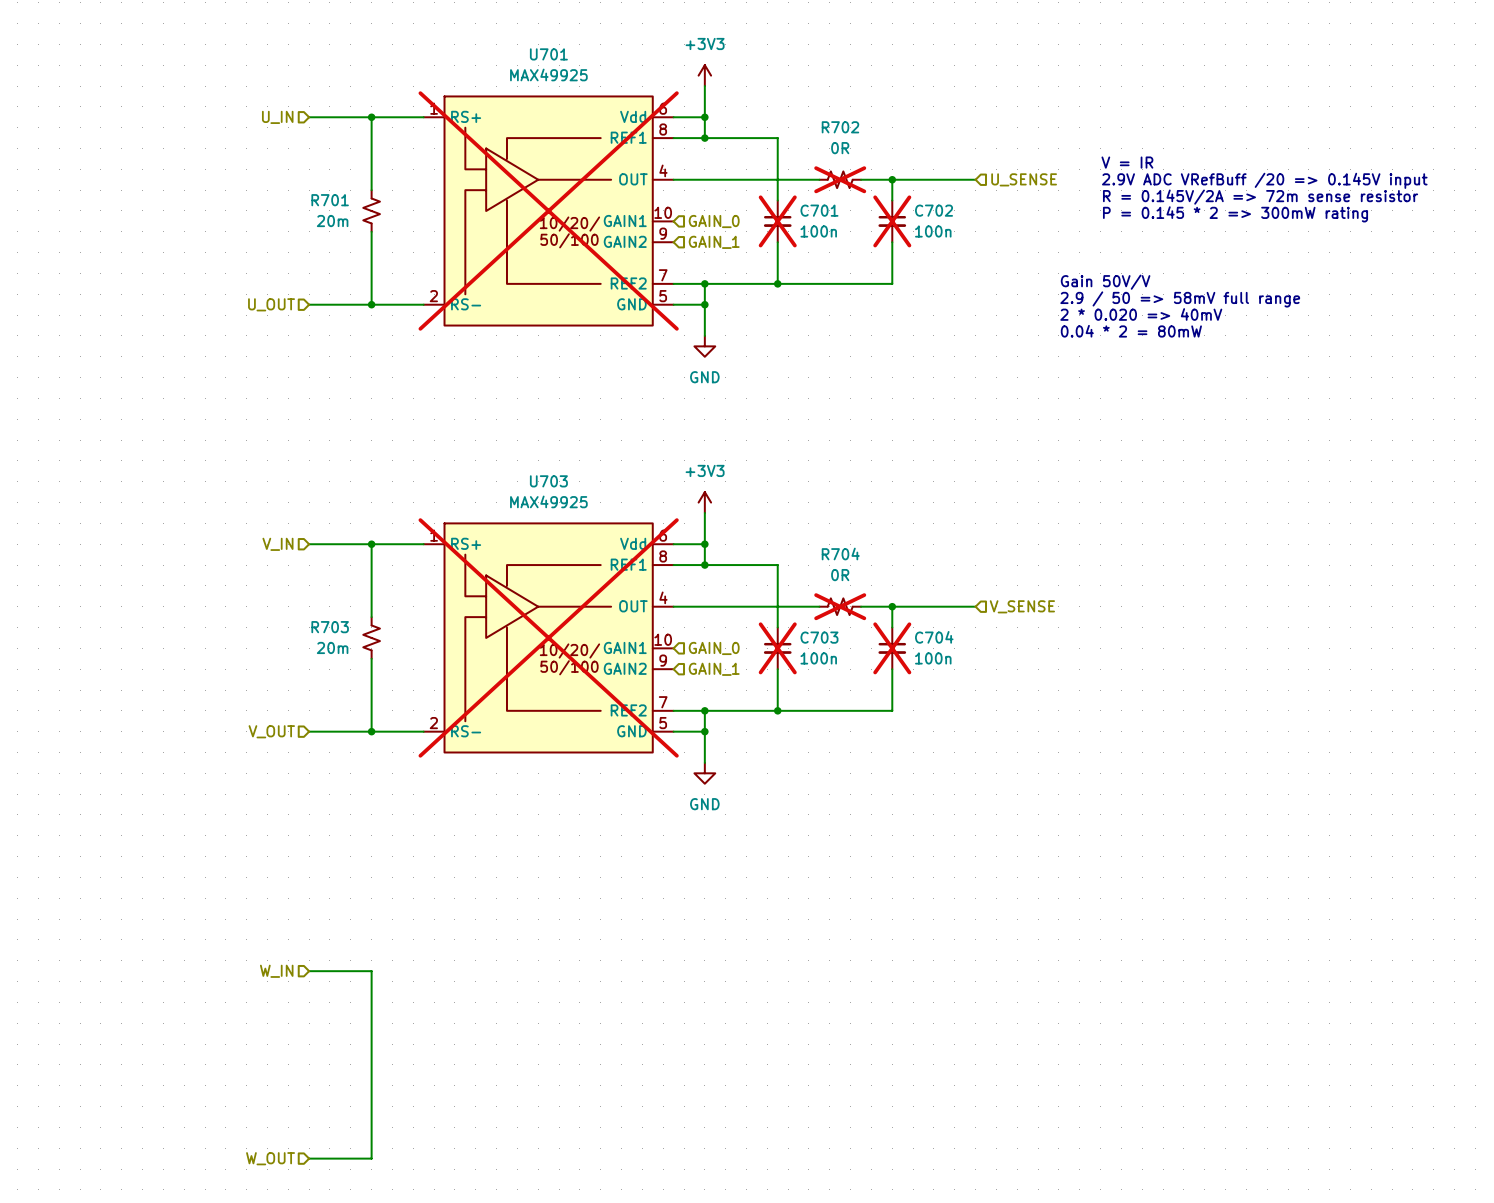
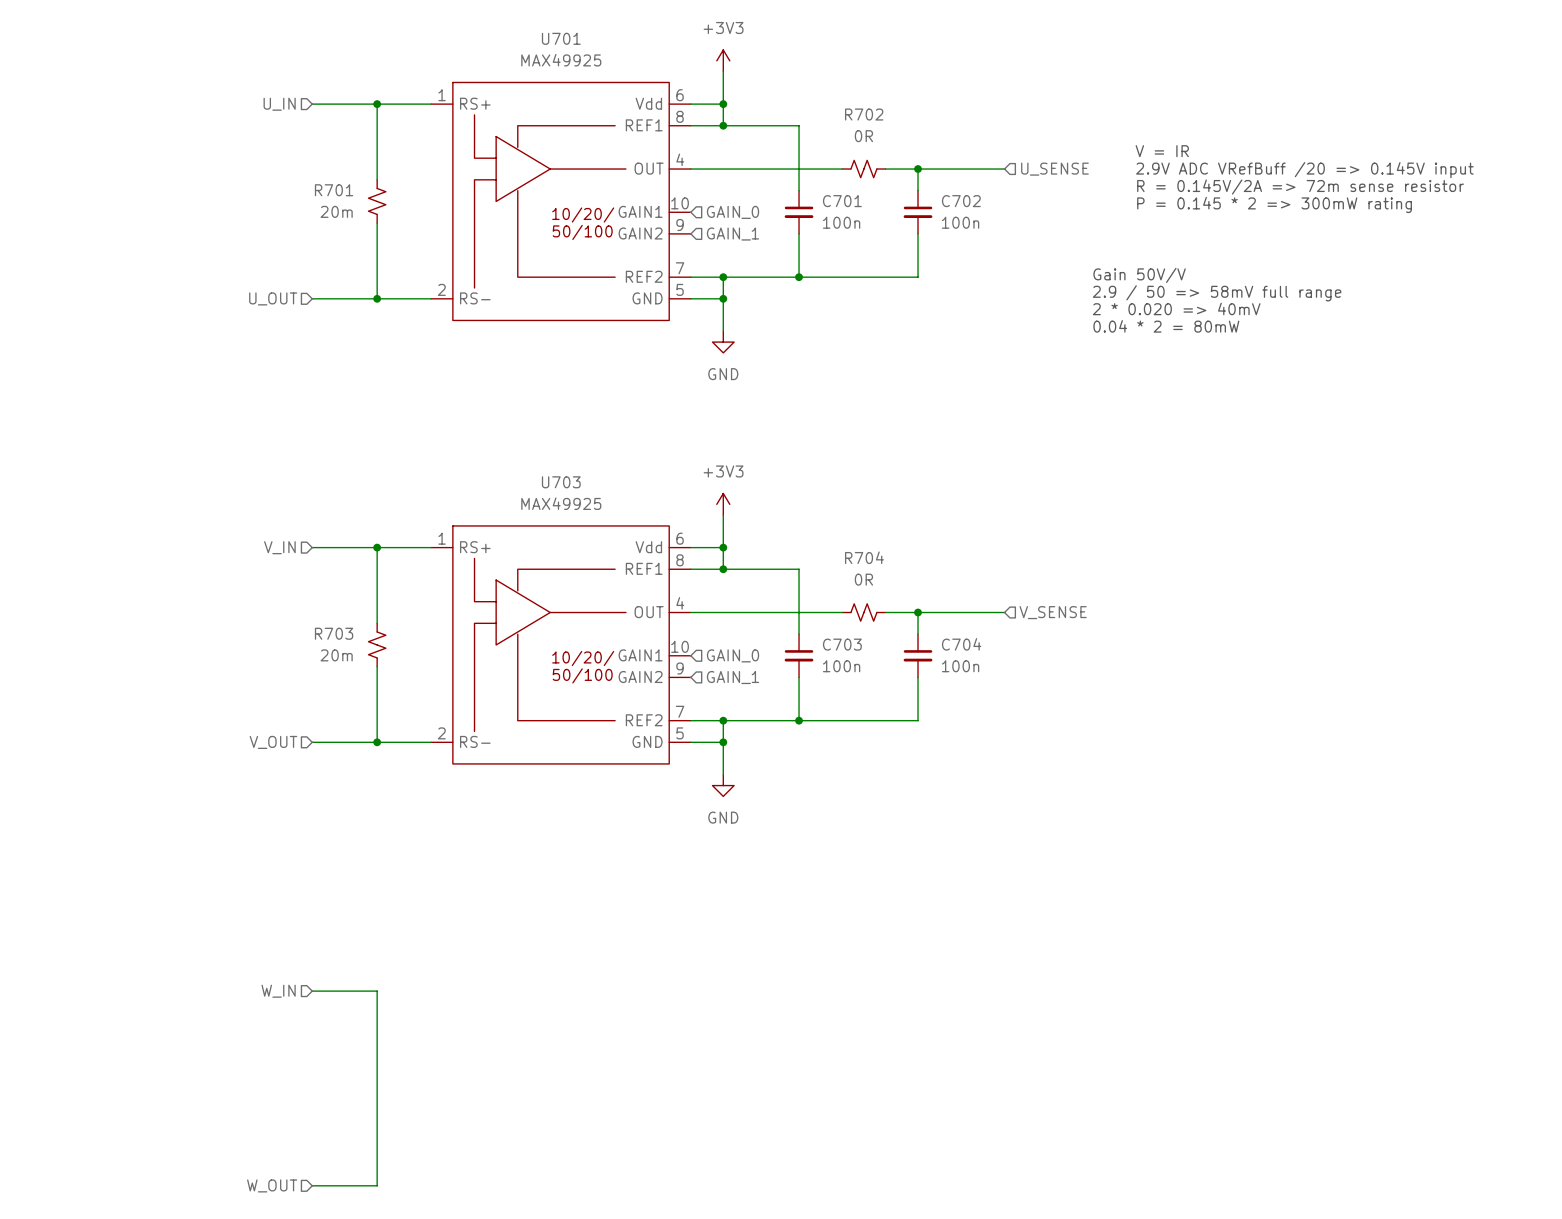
R702 do-not-place cross: (840, 179) -> none
U701 do-not-place cross: (548, 210) -> none
C701 do-not-place cross: (777, 221) -> none
C702 do-not-place cross: (892, 221) -> none
R704 do-not-place cross: (840, 606) -> none
U703 do-not-place cross: (548, 637) -> none
C703 do-not-place cross: (777, 648) -> none
C704 do-not-place cross: (892, 648) -> none

